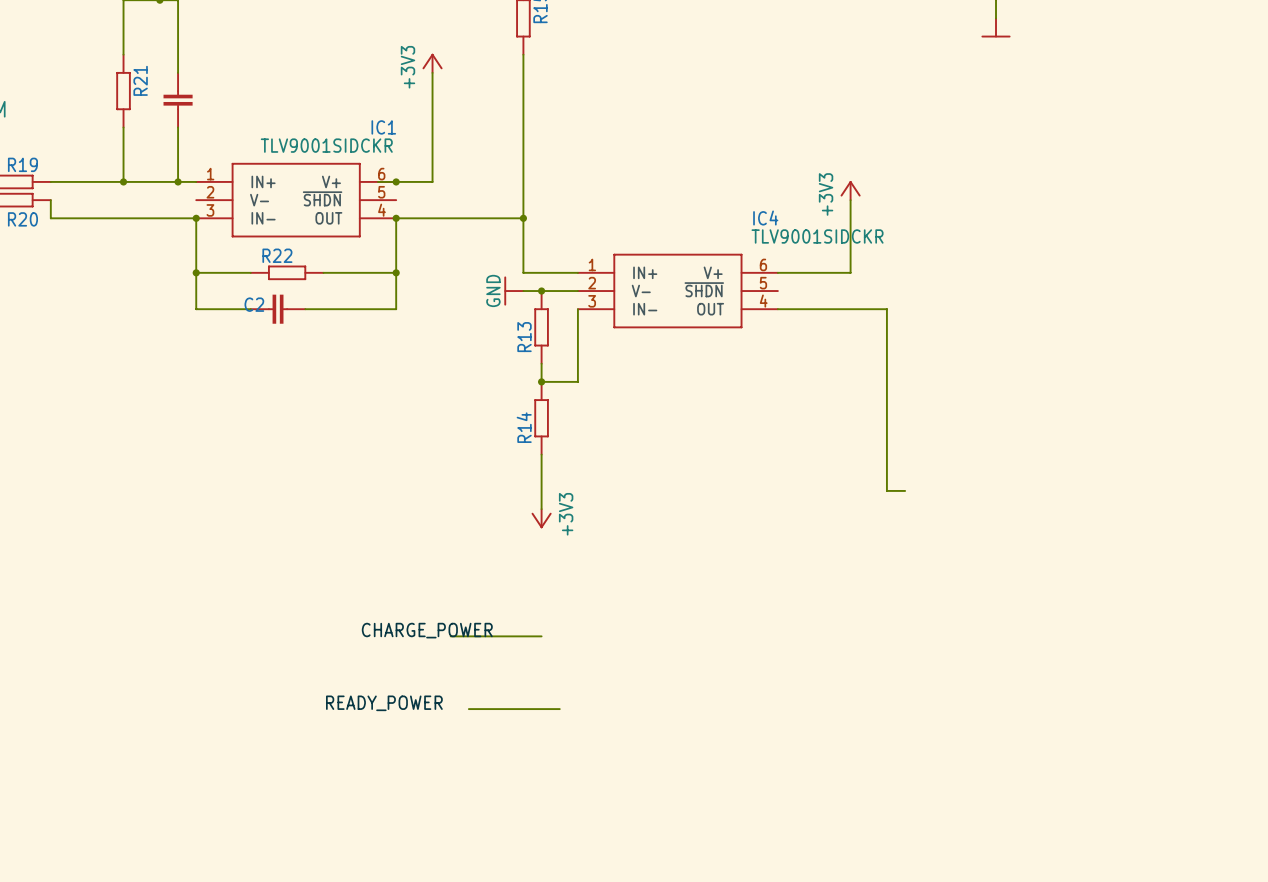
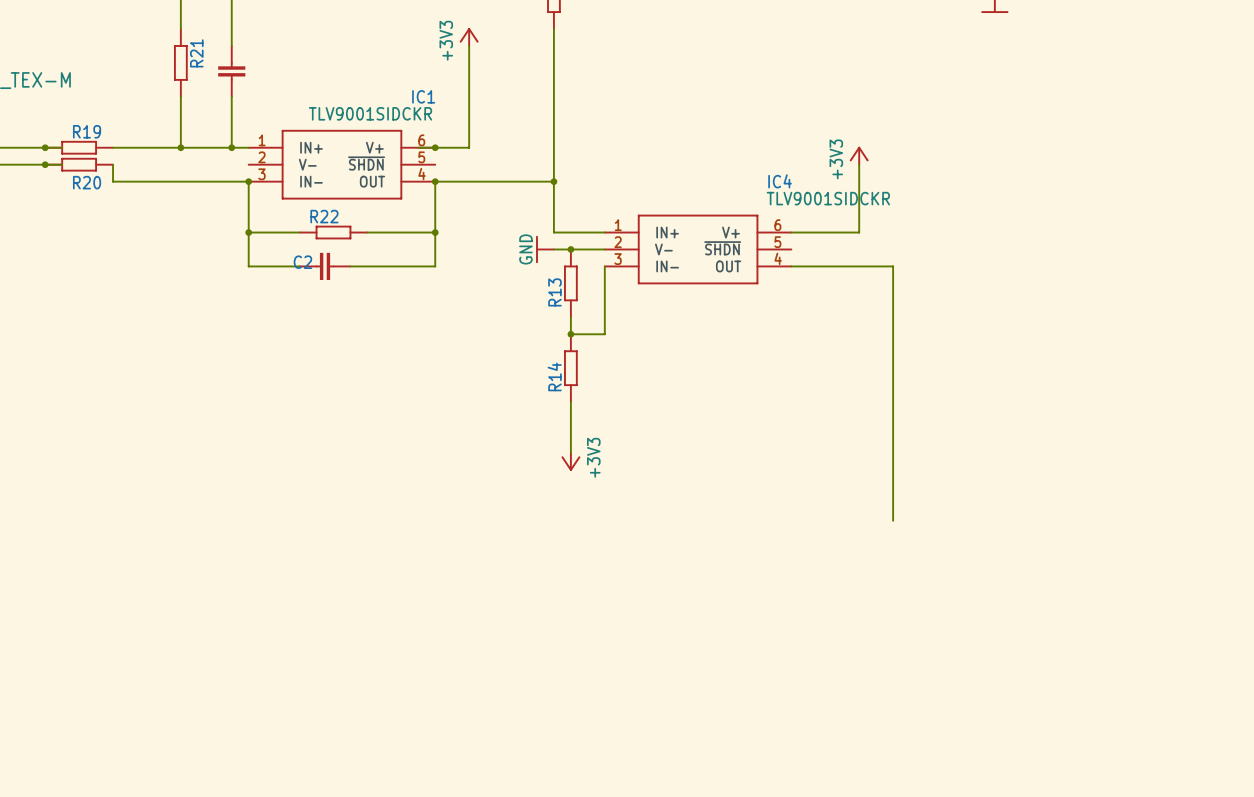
wire: (886, 490) (905, 490) -> (893, 436) (893, 520)
label: CHARGE_POWER (427, 630) -> none
wire: (450, 636) (541, 636) -> none
label: READY_POWER (384, 703) -> none
wire: (468, 709) (559, 709) -> none

